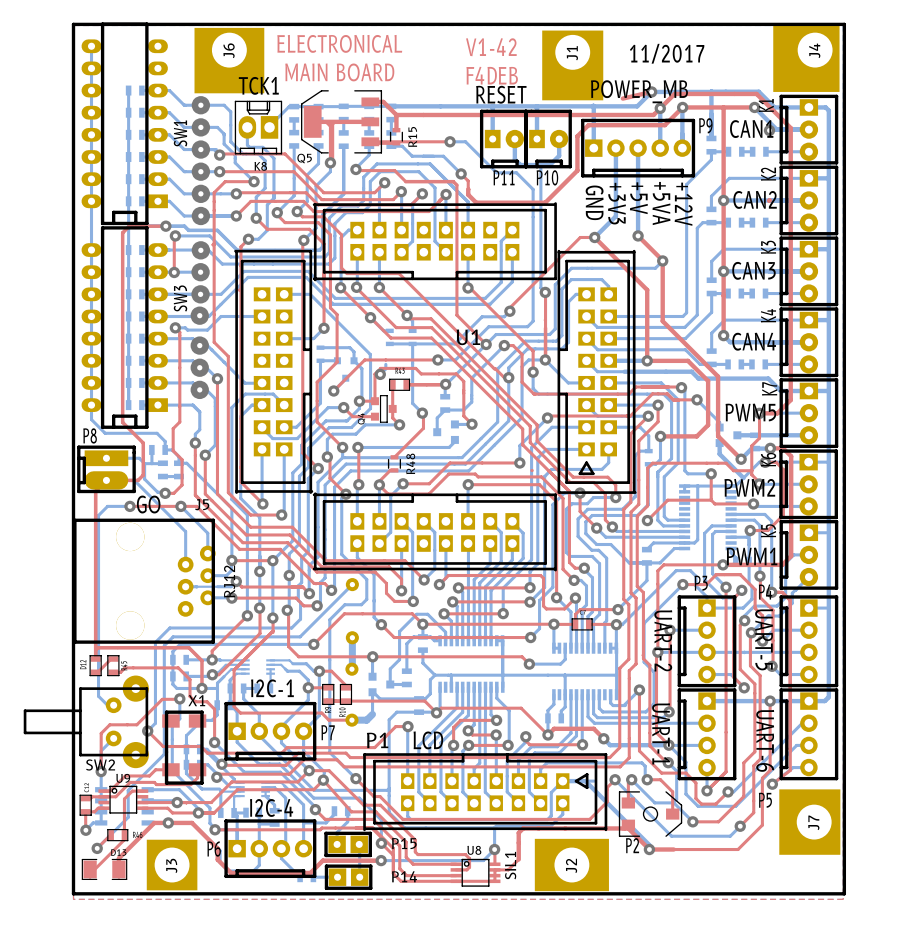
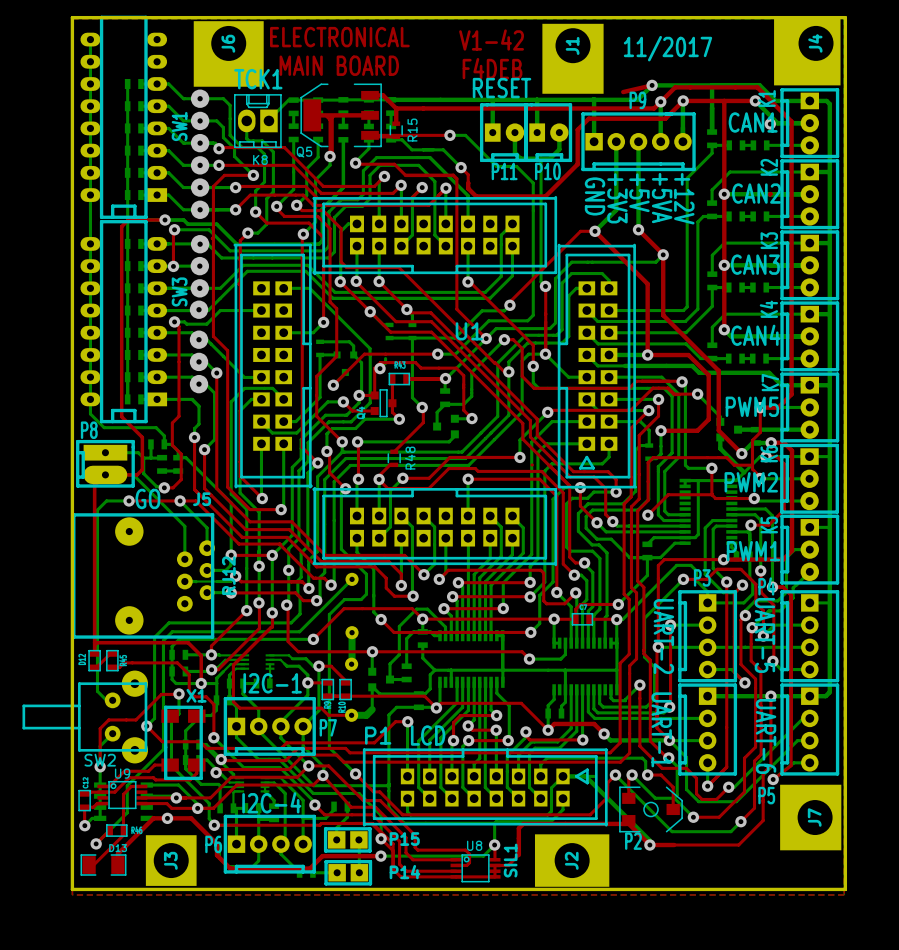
text: POWER_MB (639, 91) -> none
P9 name position: P9 (705, 125) -> P9 (637, 100)
J5 footprint: [73, 518, 216, 644] -> [72, 513, 215, 639]

